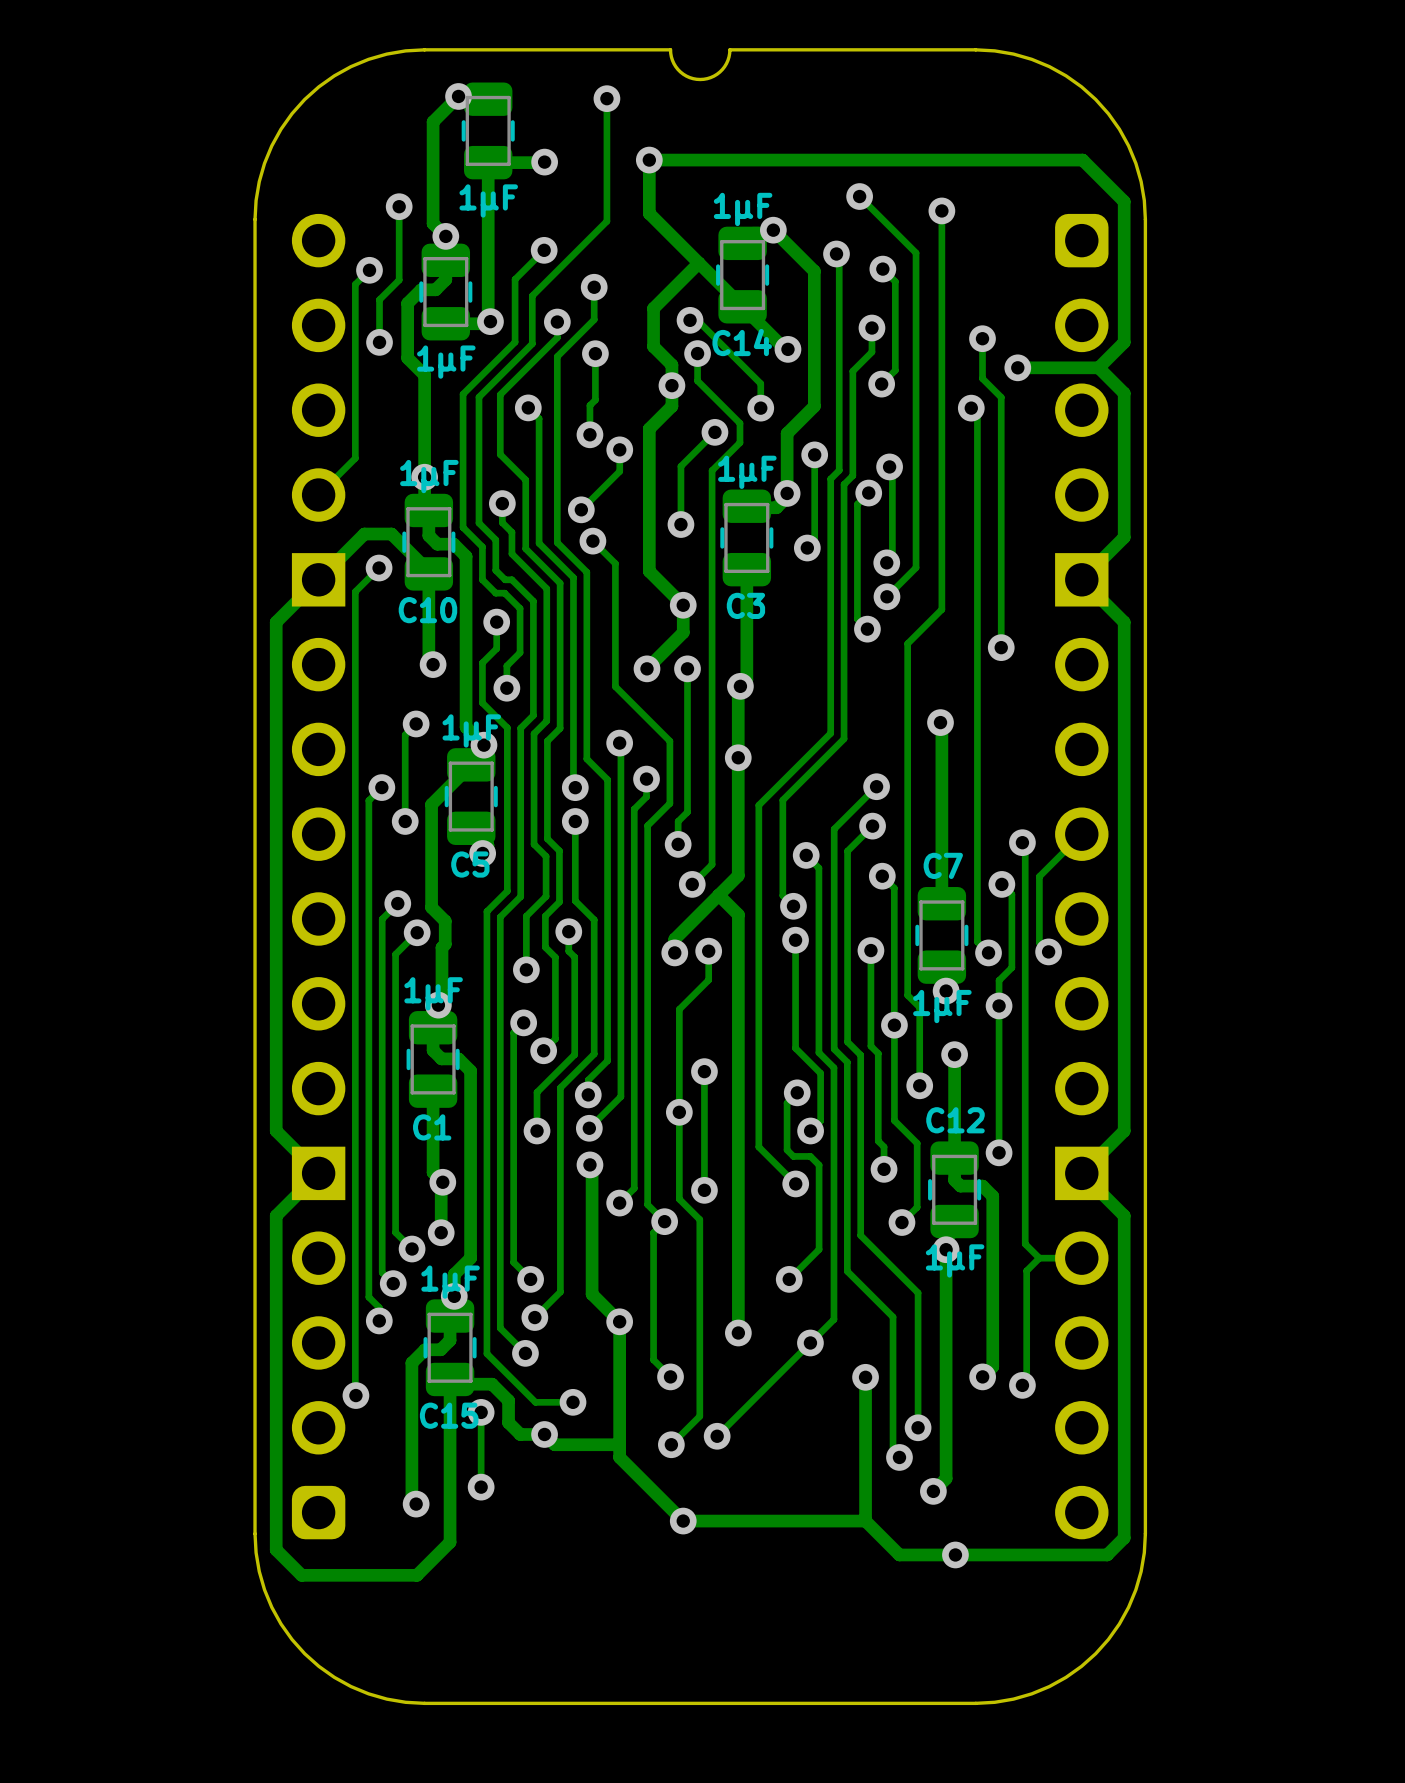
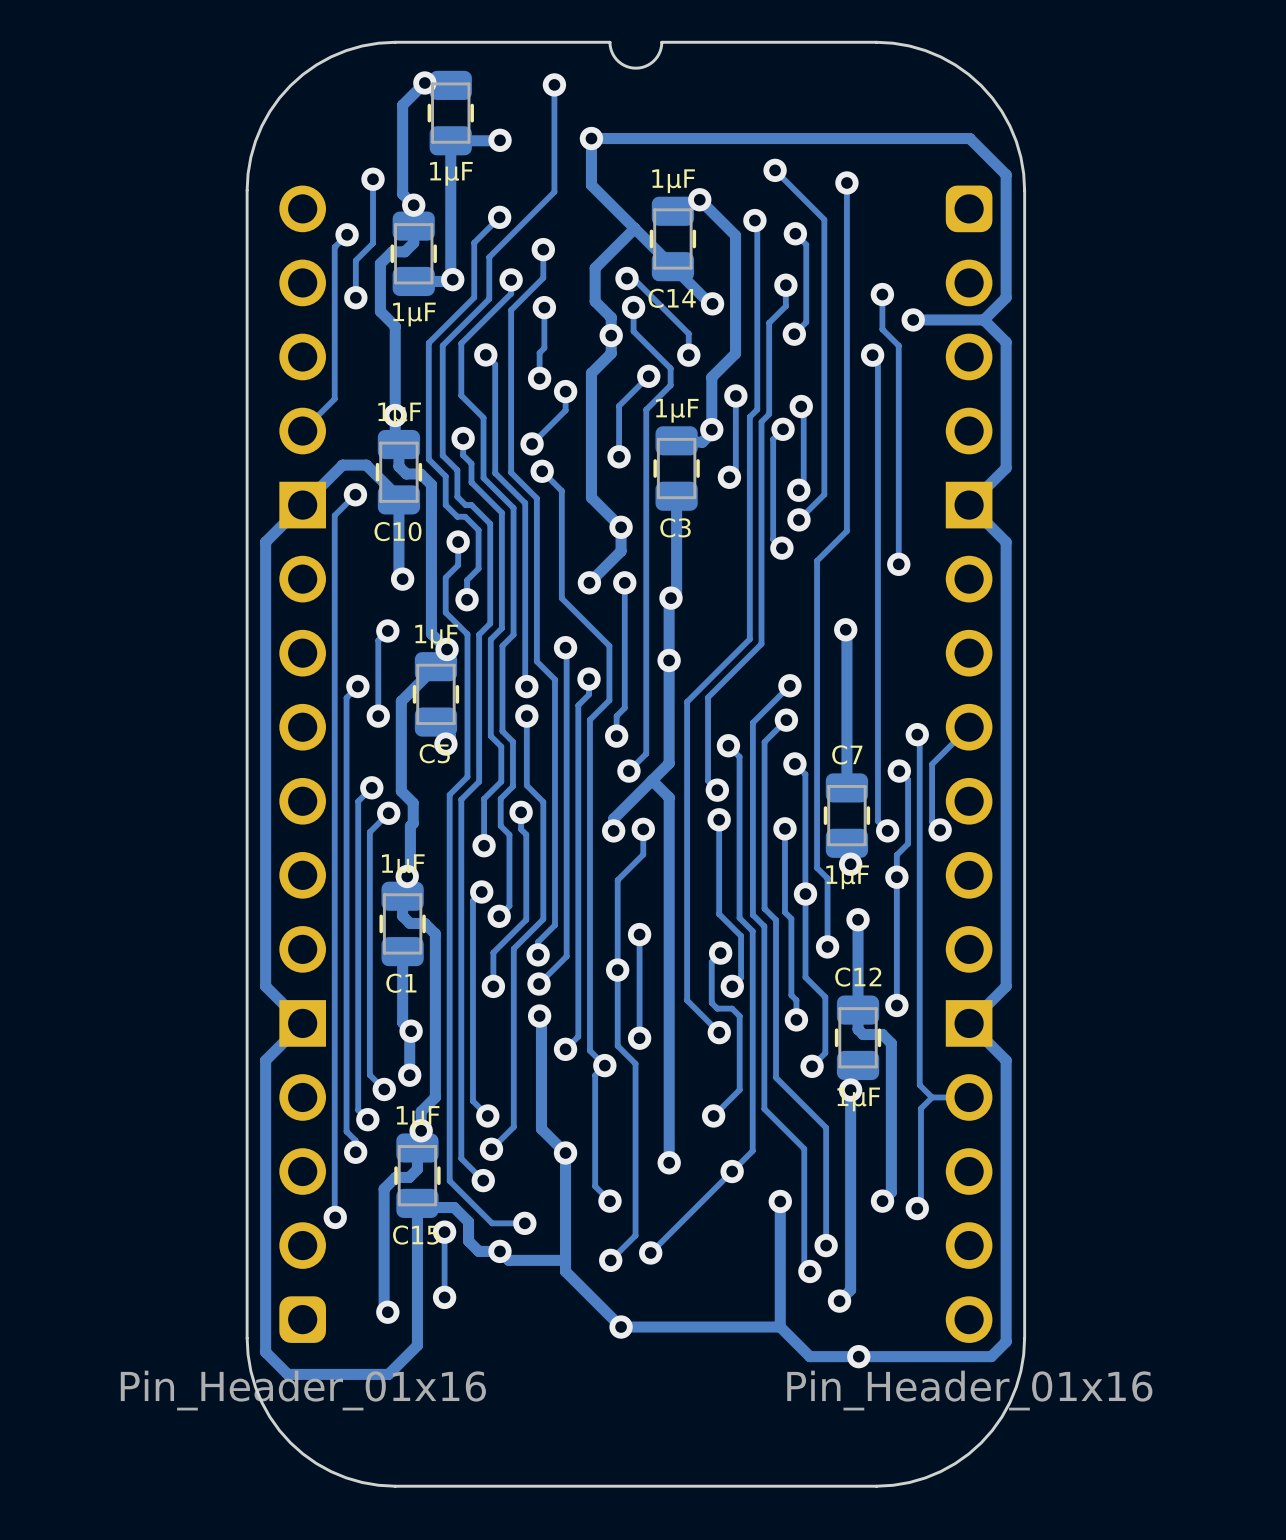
drawing: none -> [120, 1370, 486, 1411]
drawing: none -> [787, 1370, 1153, 1411]

